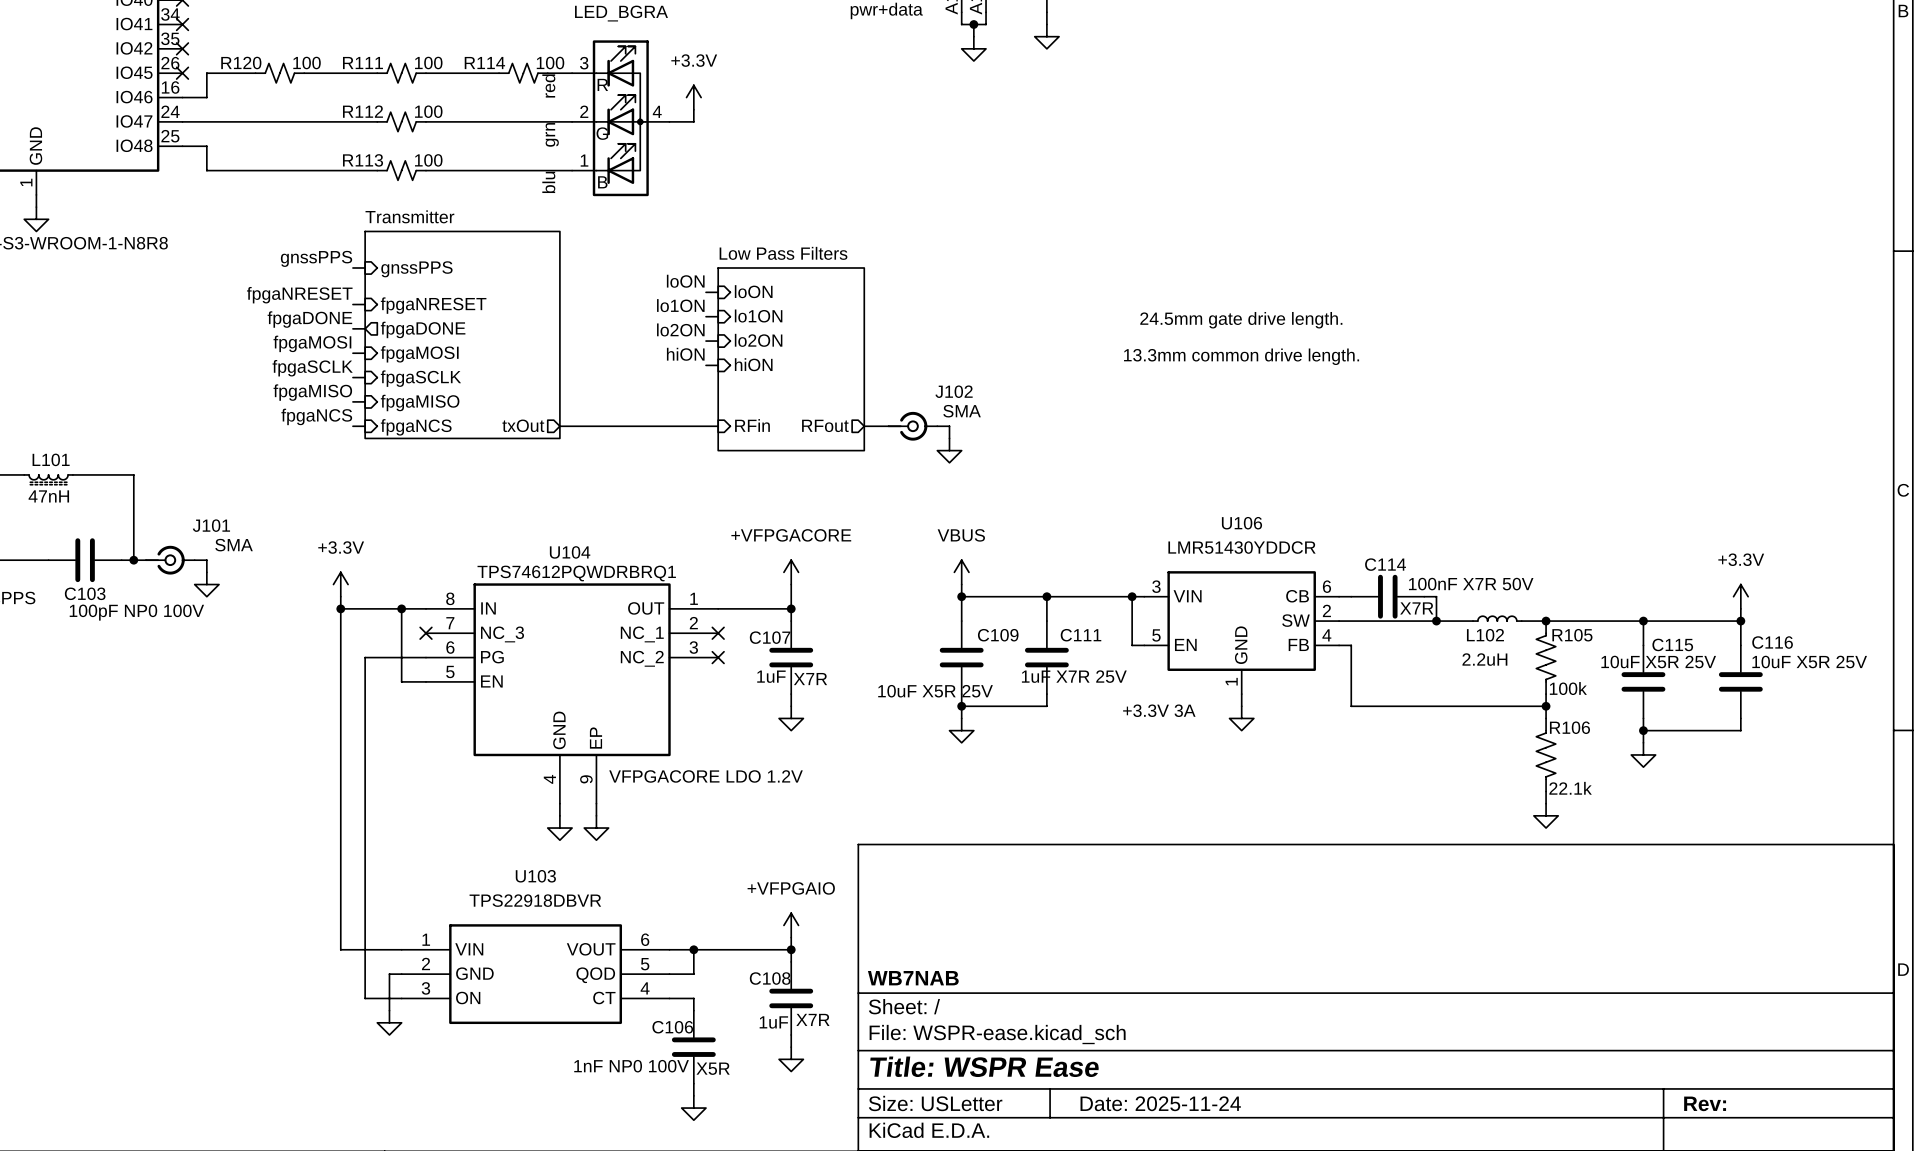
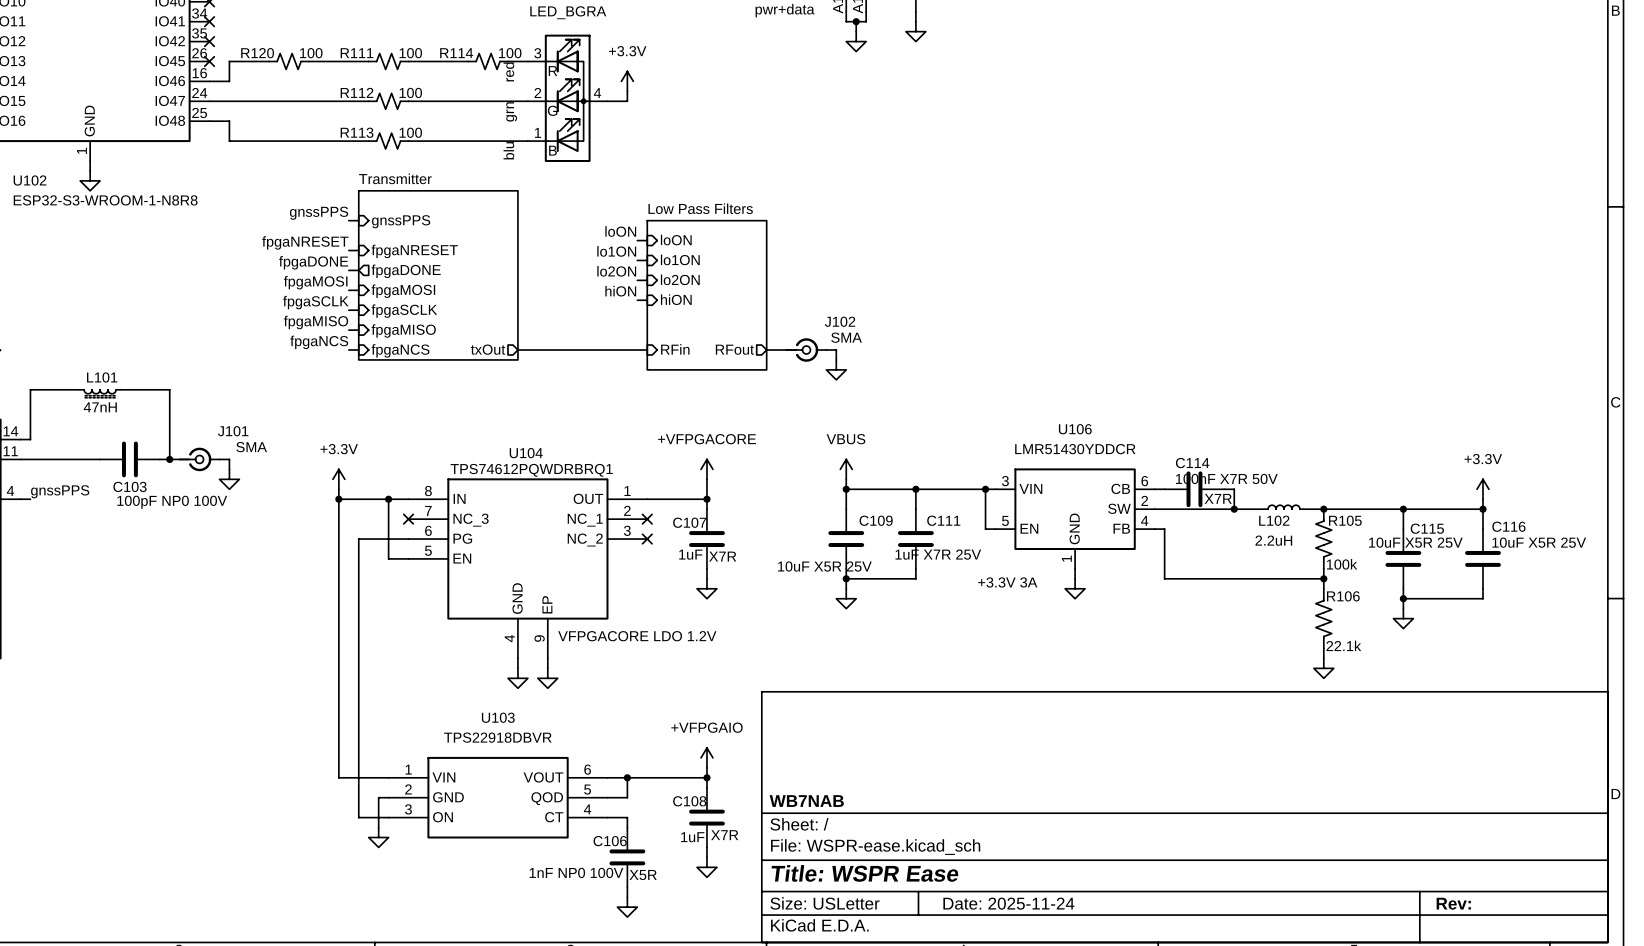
text: 24.5mm gate drive length. (1241, 320) -> none
text: 13.3mm common drive length. (1241, 356) -> none
C114 value position: 100nF X7R 50V (1471, 584) -> 100nF X7R 50V (1226, 478)

